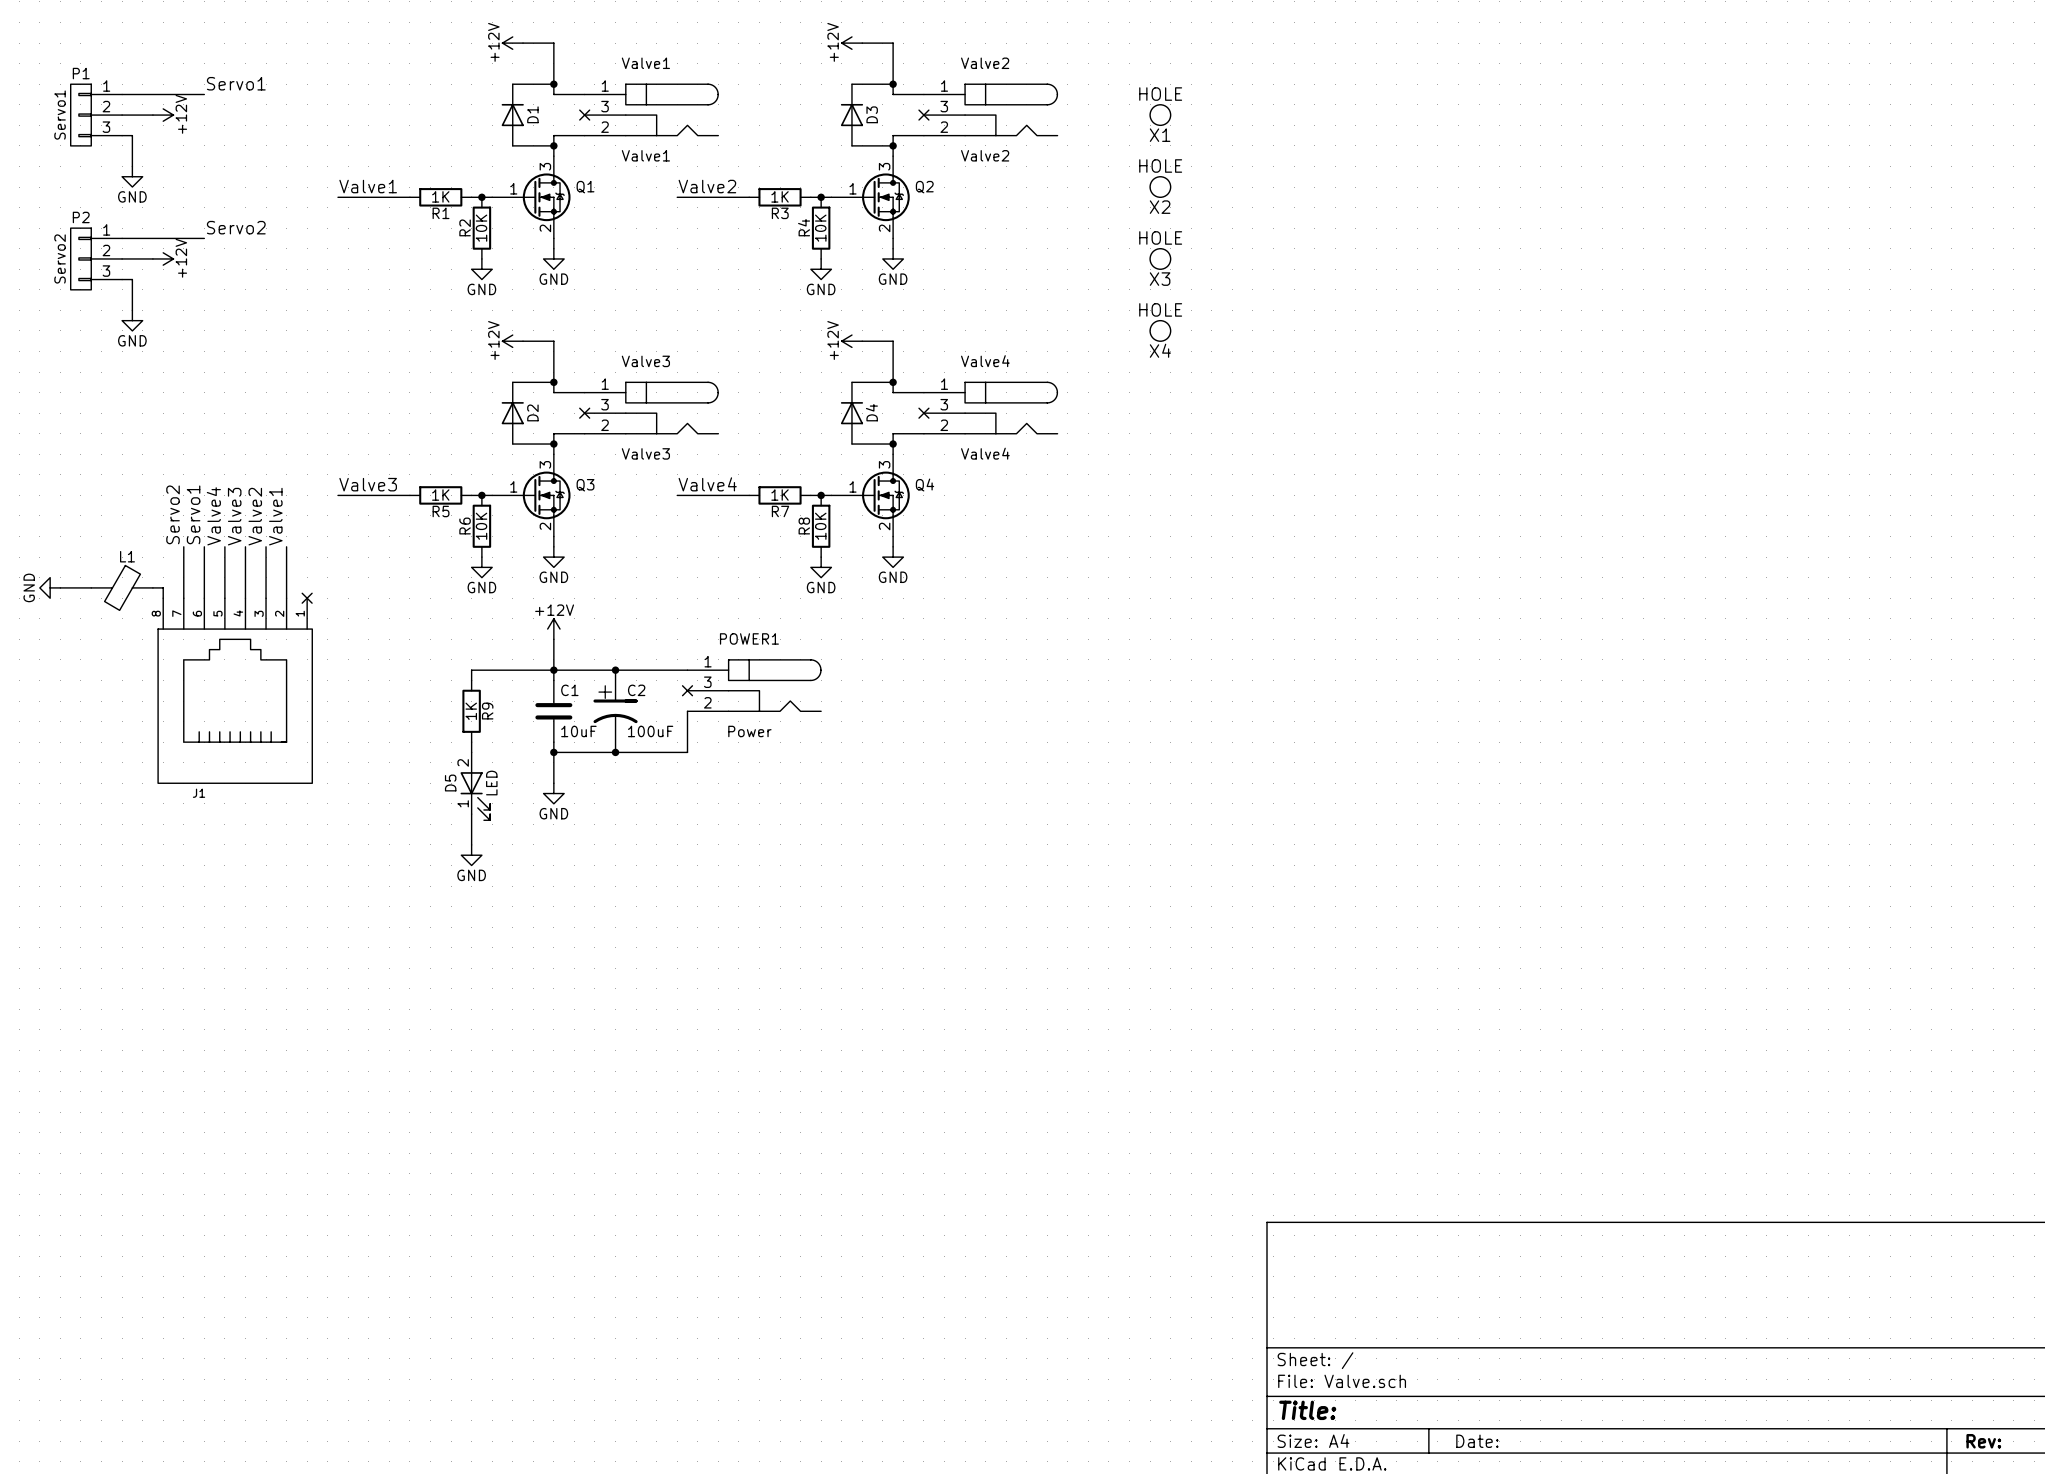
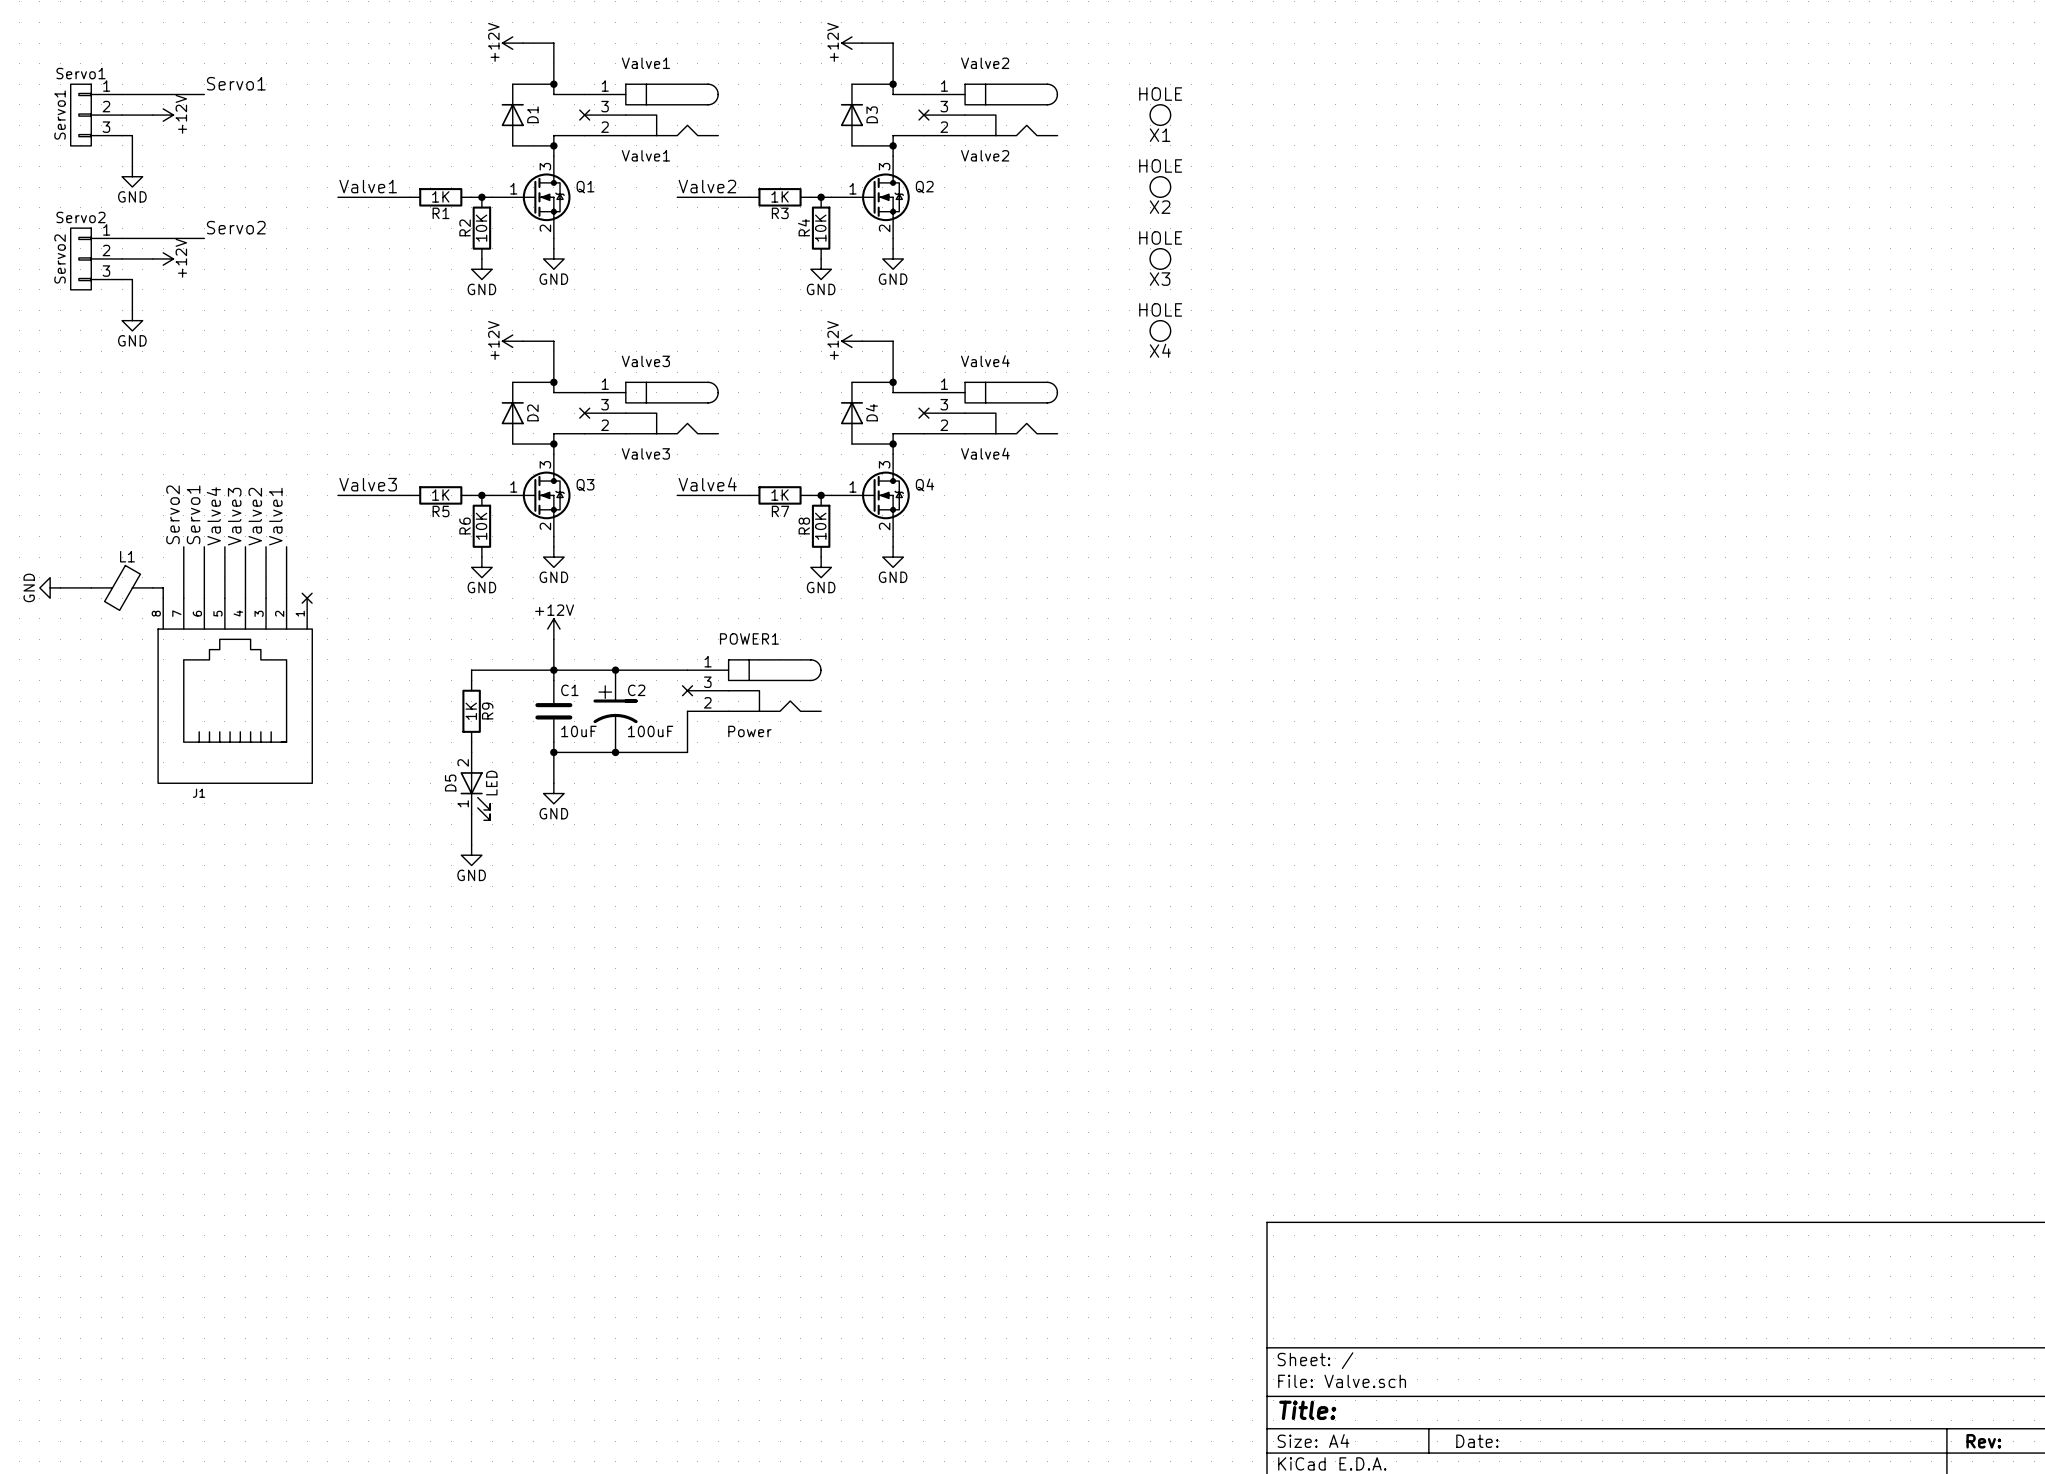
P1 name: P1 (81, 73) -> Servo1 (80, 73)
P2 name: P2 (81, 217) -> Servo2 (80, 217)

